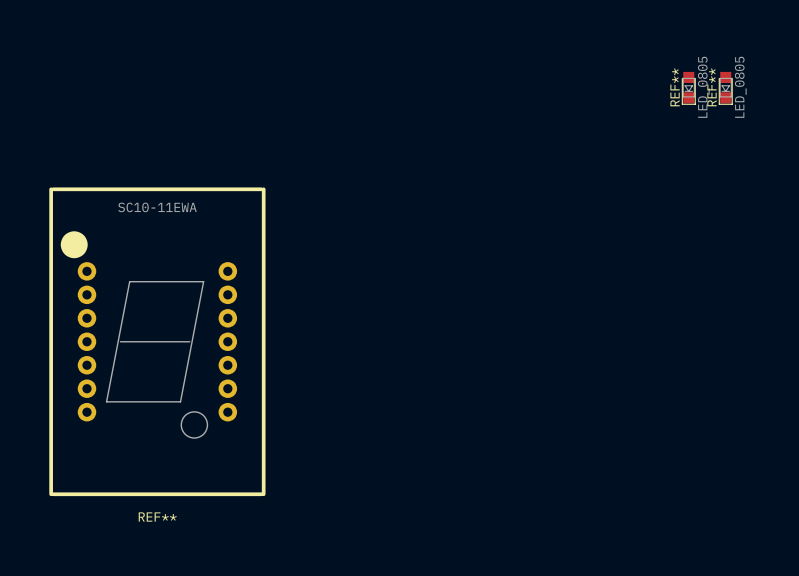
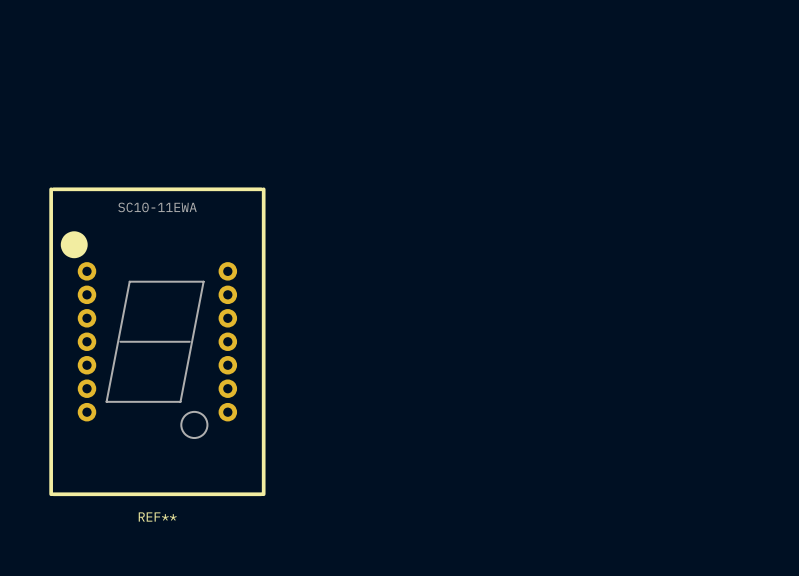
REF**: LED_0805 (688, 88) -> none
REF**: LED_0805 (725, 88) -> none

